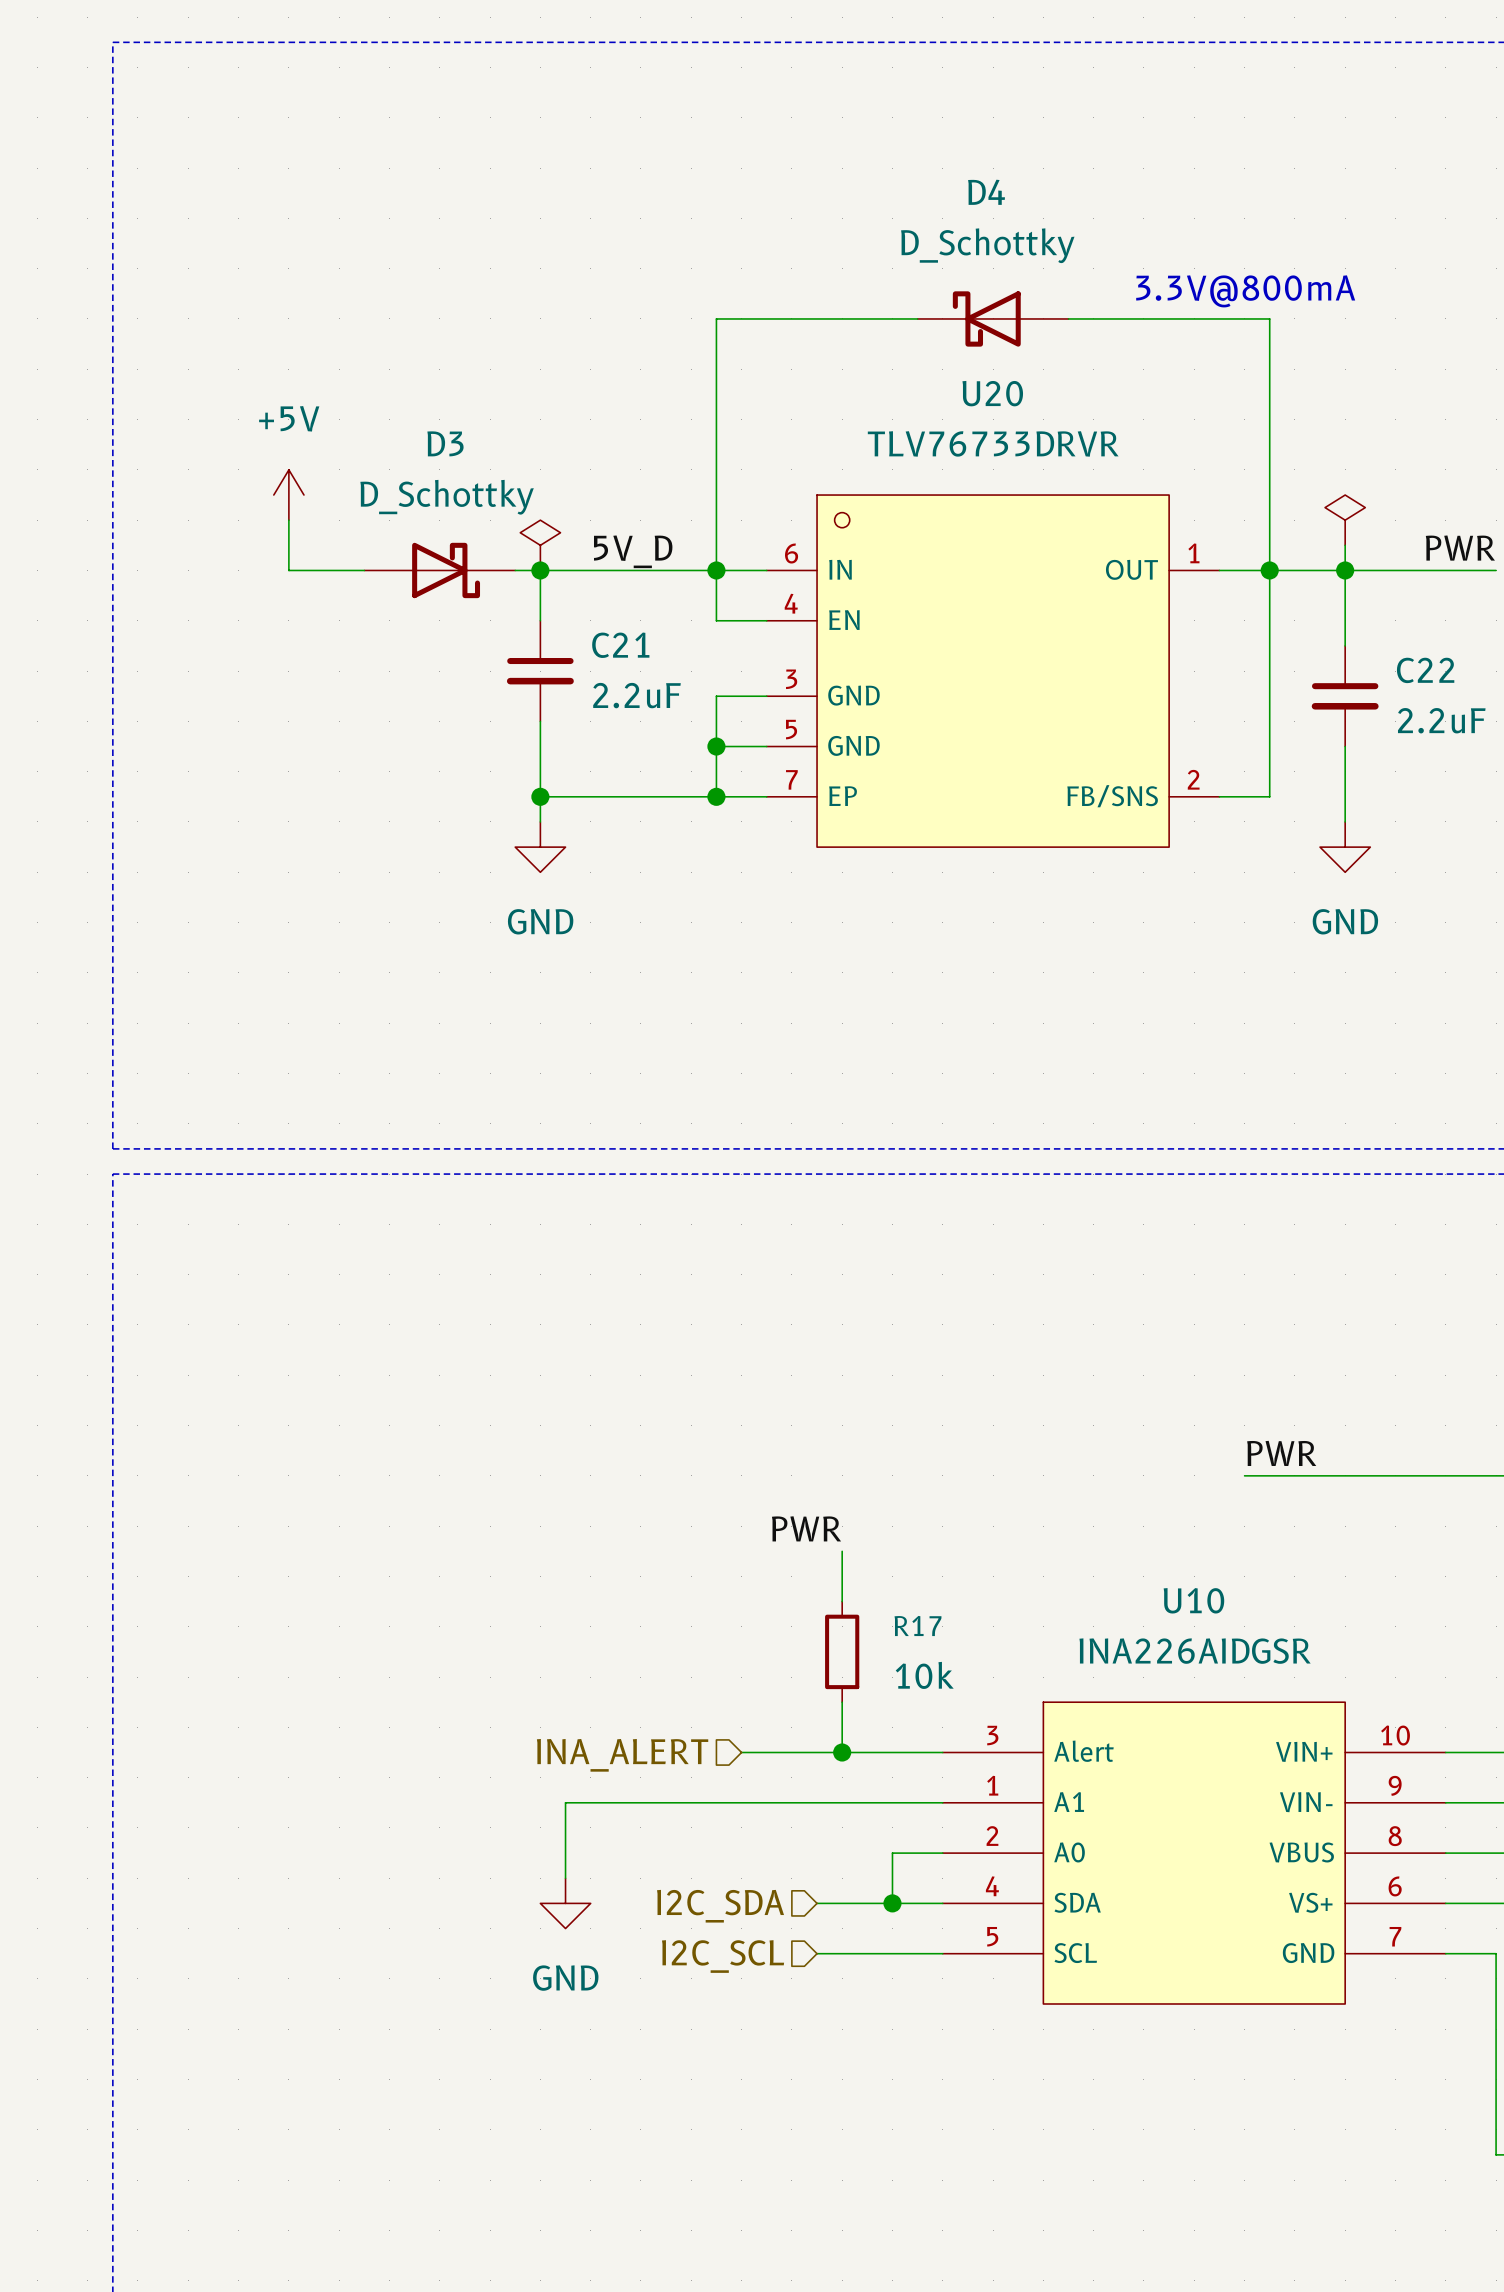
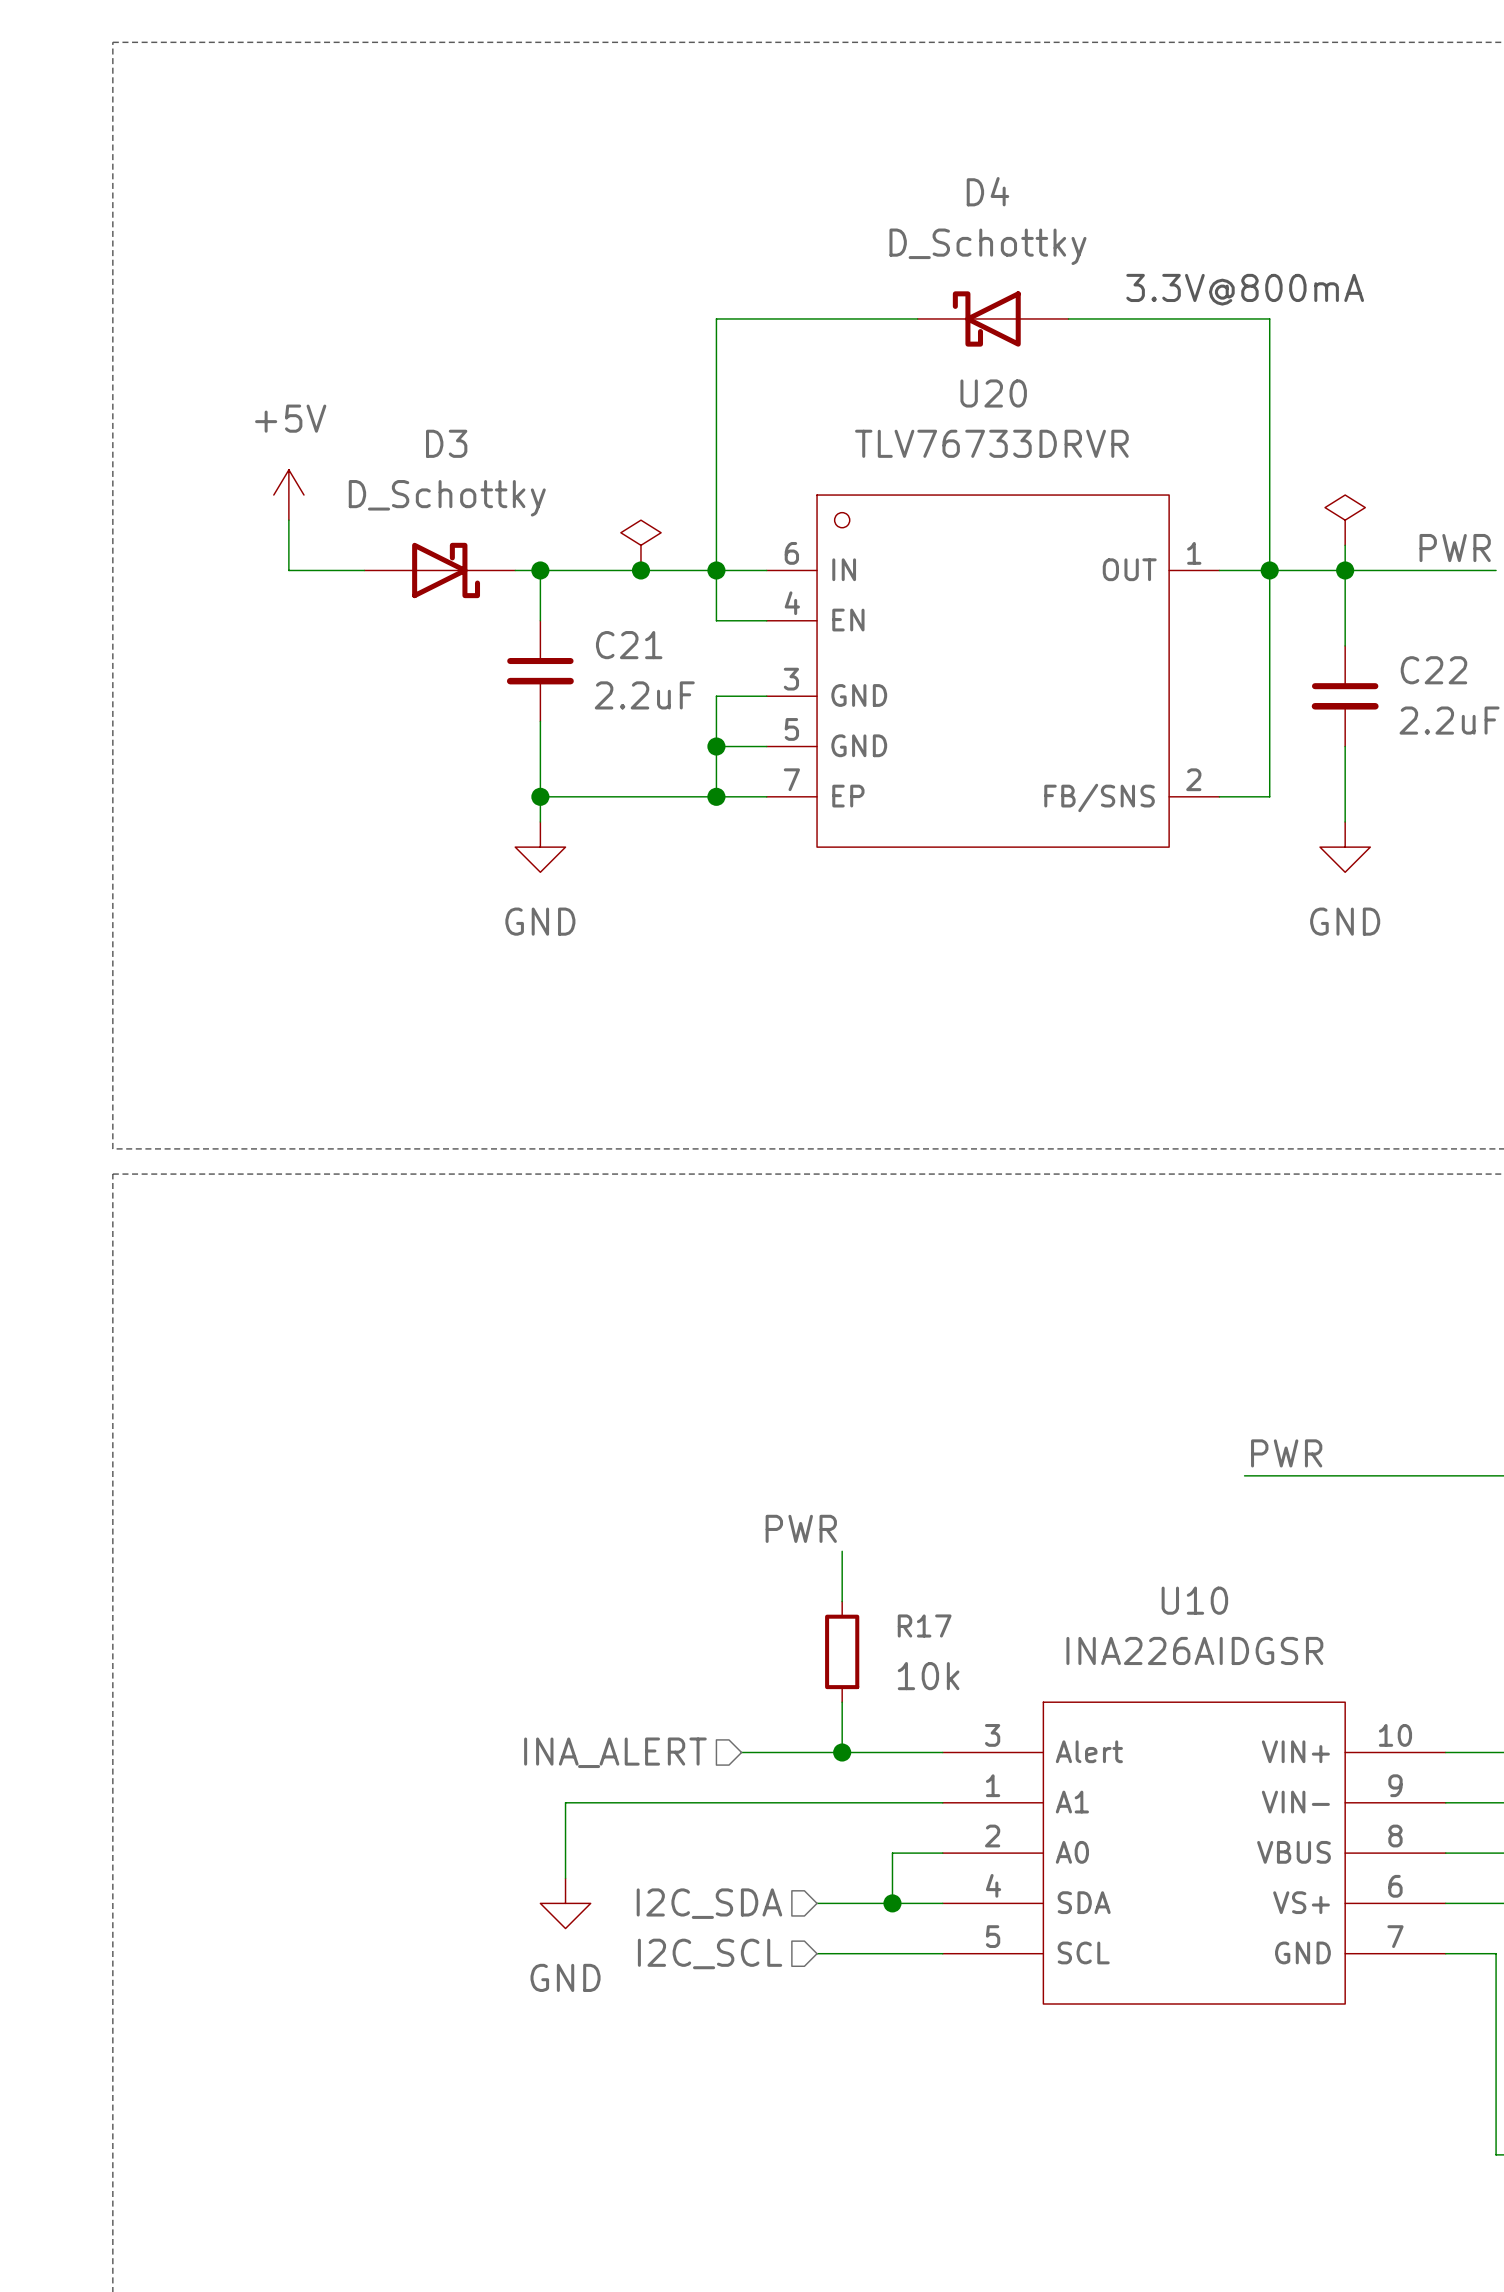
power symbol position: (540, 545) -> (640, 545)
label: 5V_D (633, 551) -> none
junction: none -> (640, 570)

